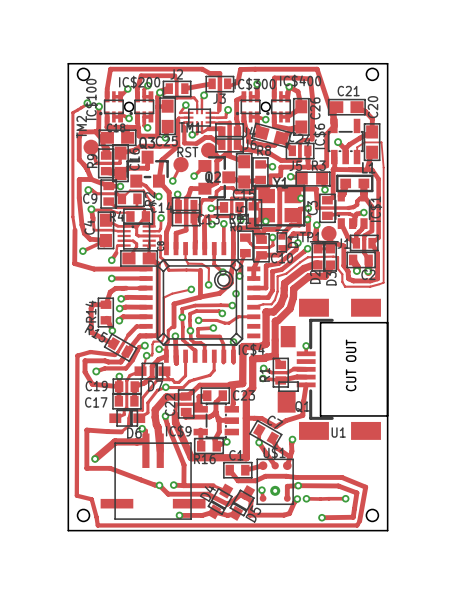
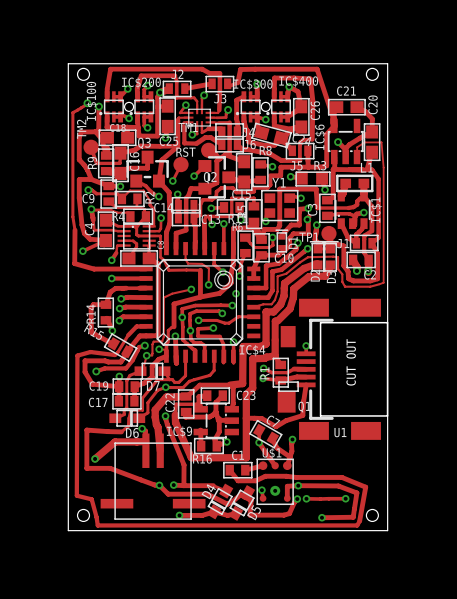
Y1 footprint: [254, 184, 306, 227] -> [261, 189, 299, 222]

